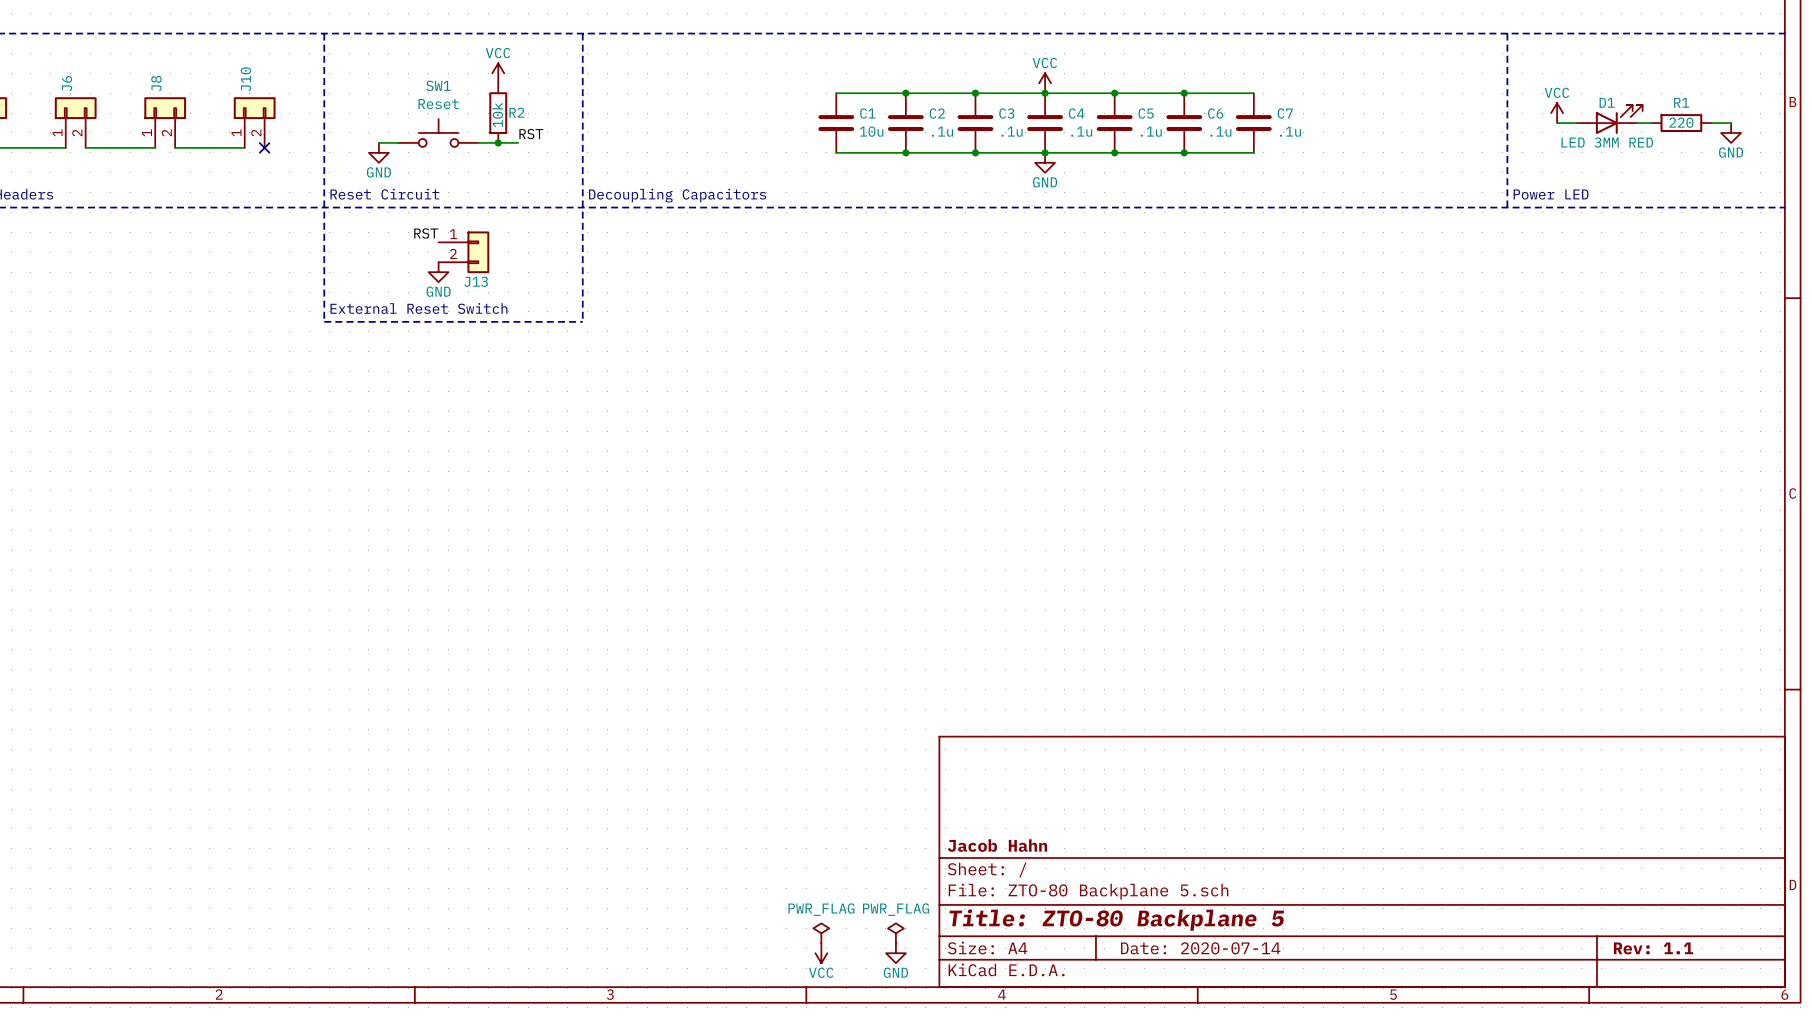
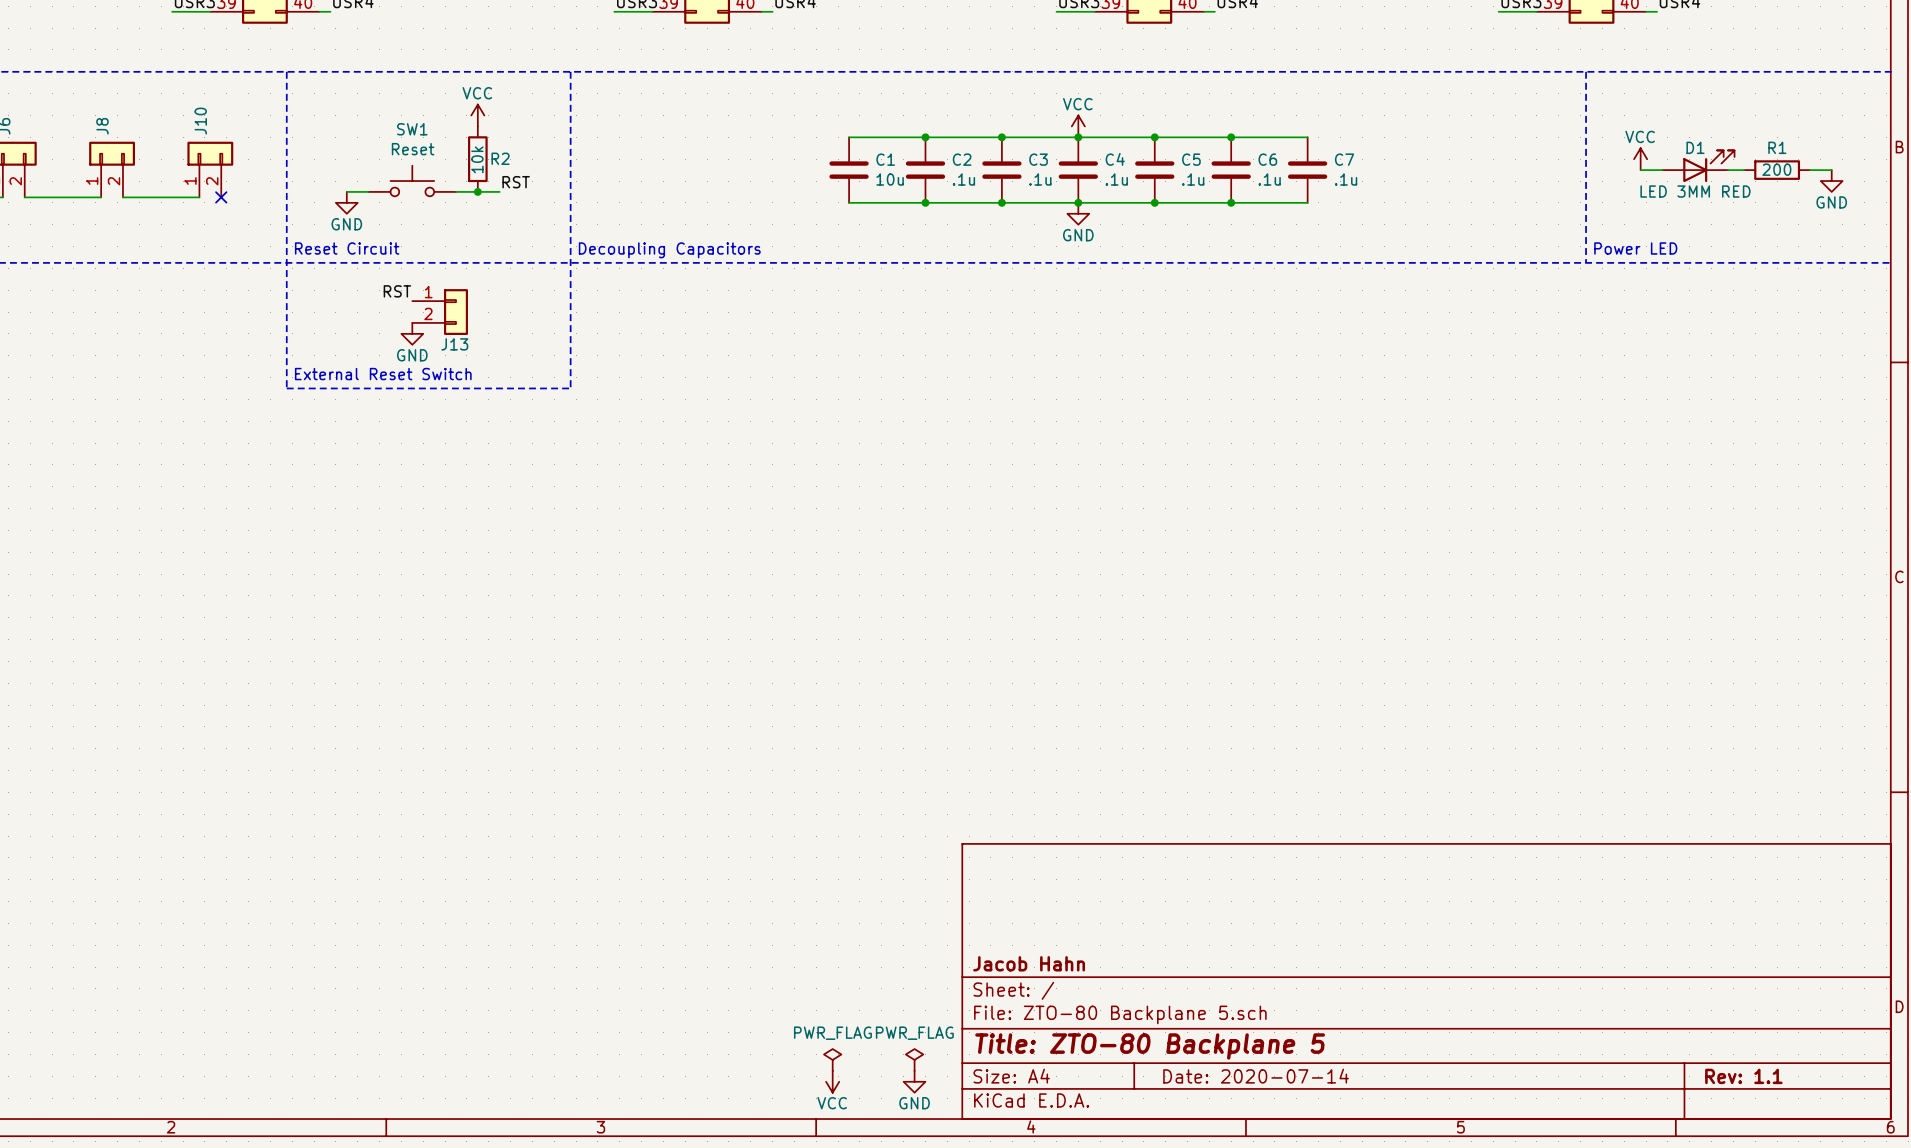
R1 value: 220 (1681, 122) -> 200 (1776, 169)

